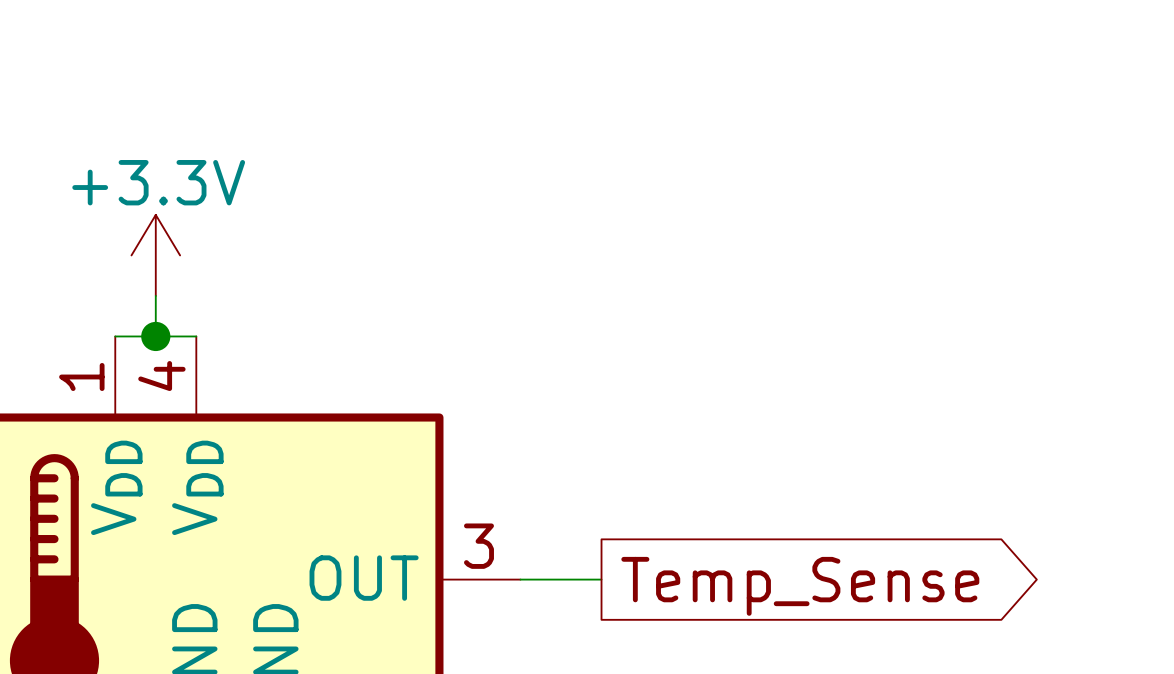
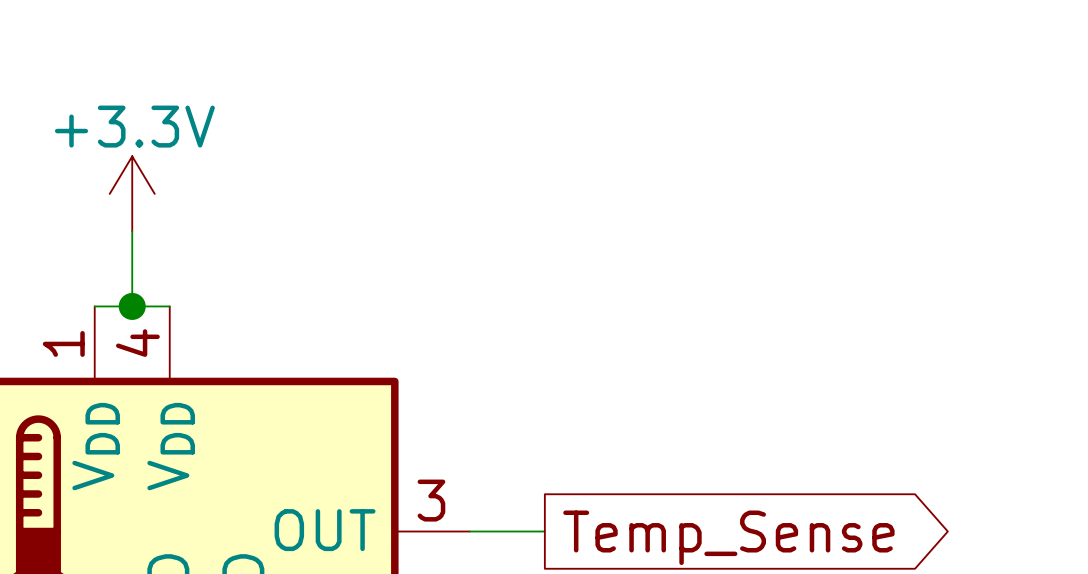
power symbol position: +3.3V (155, 255) -> +3.3V (132, 193)

